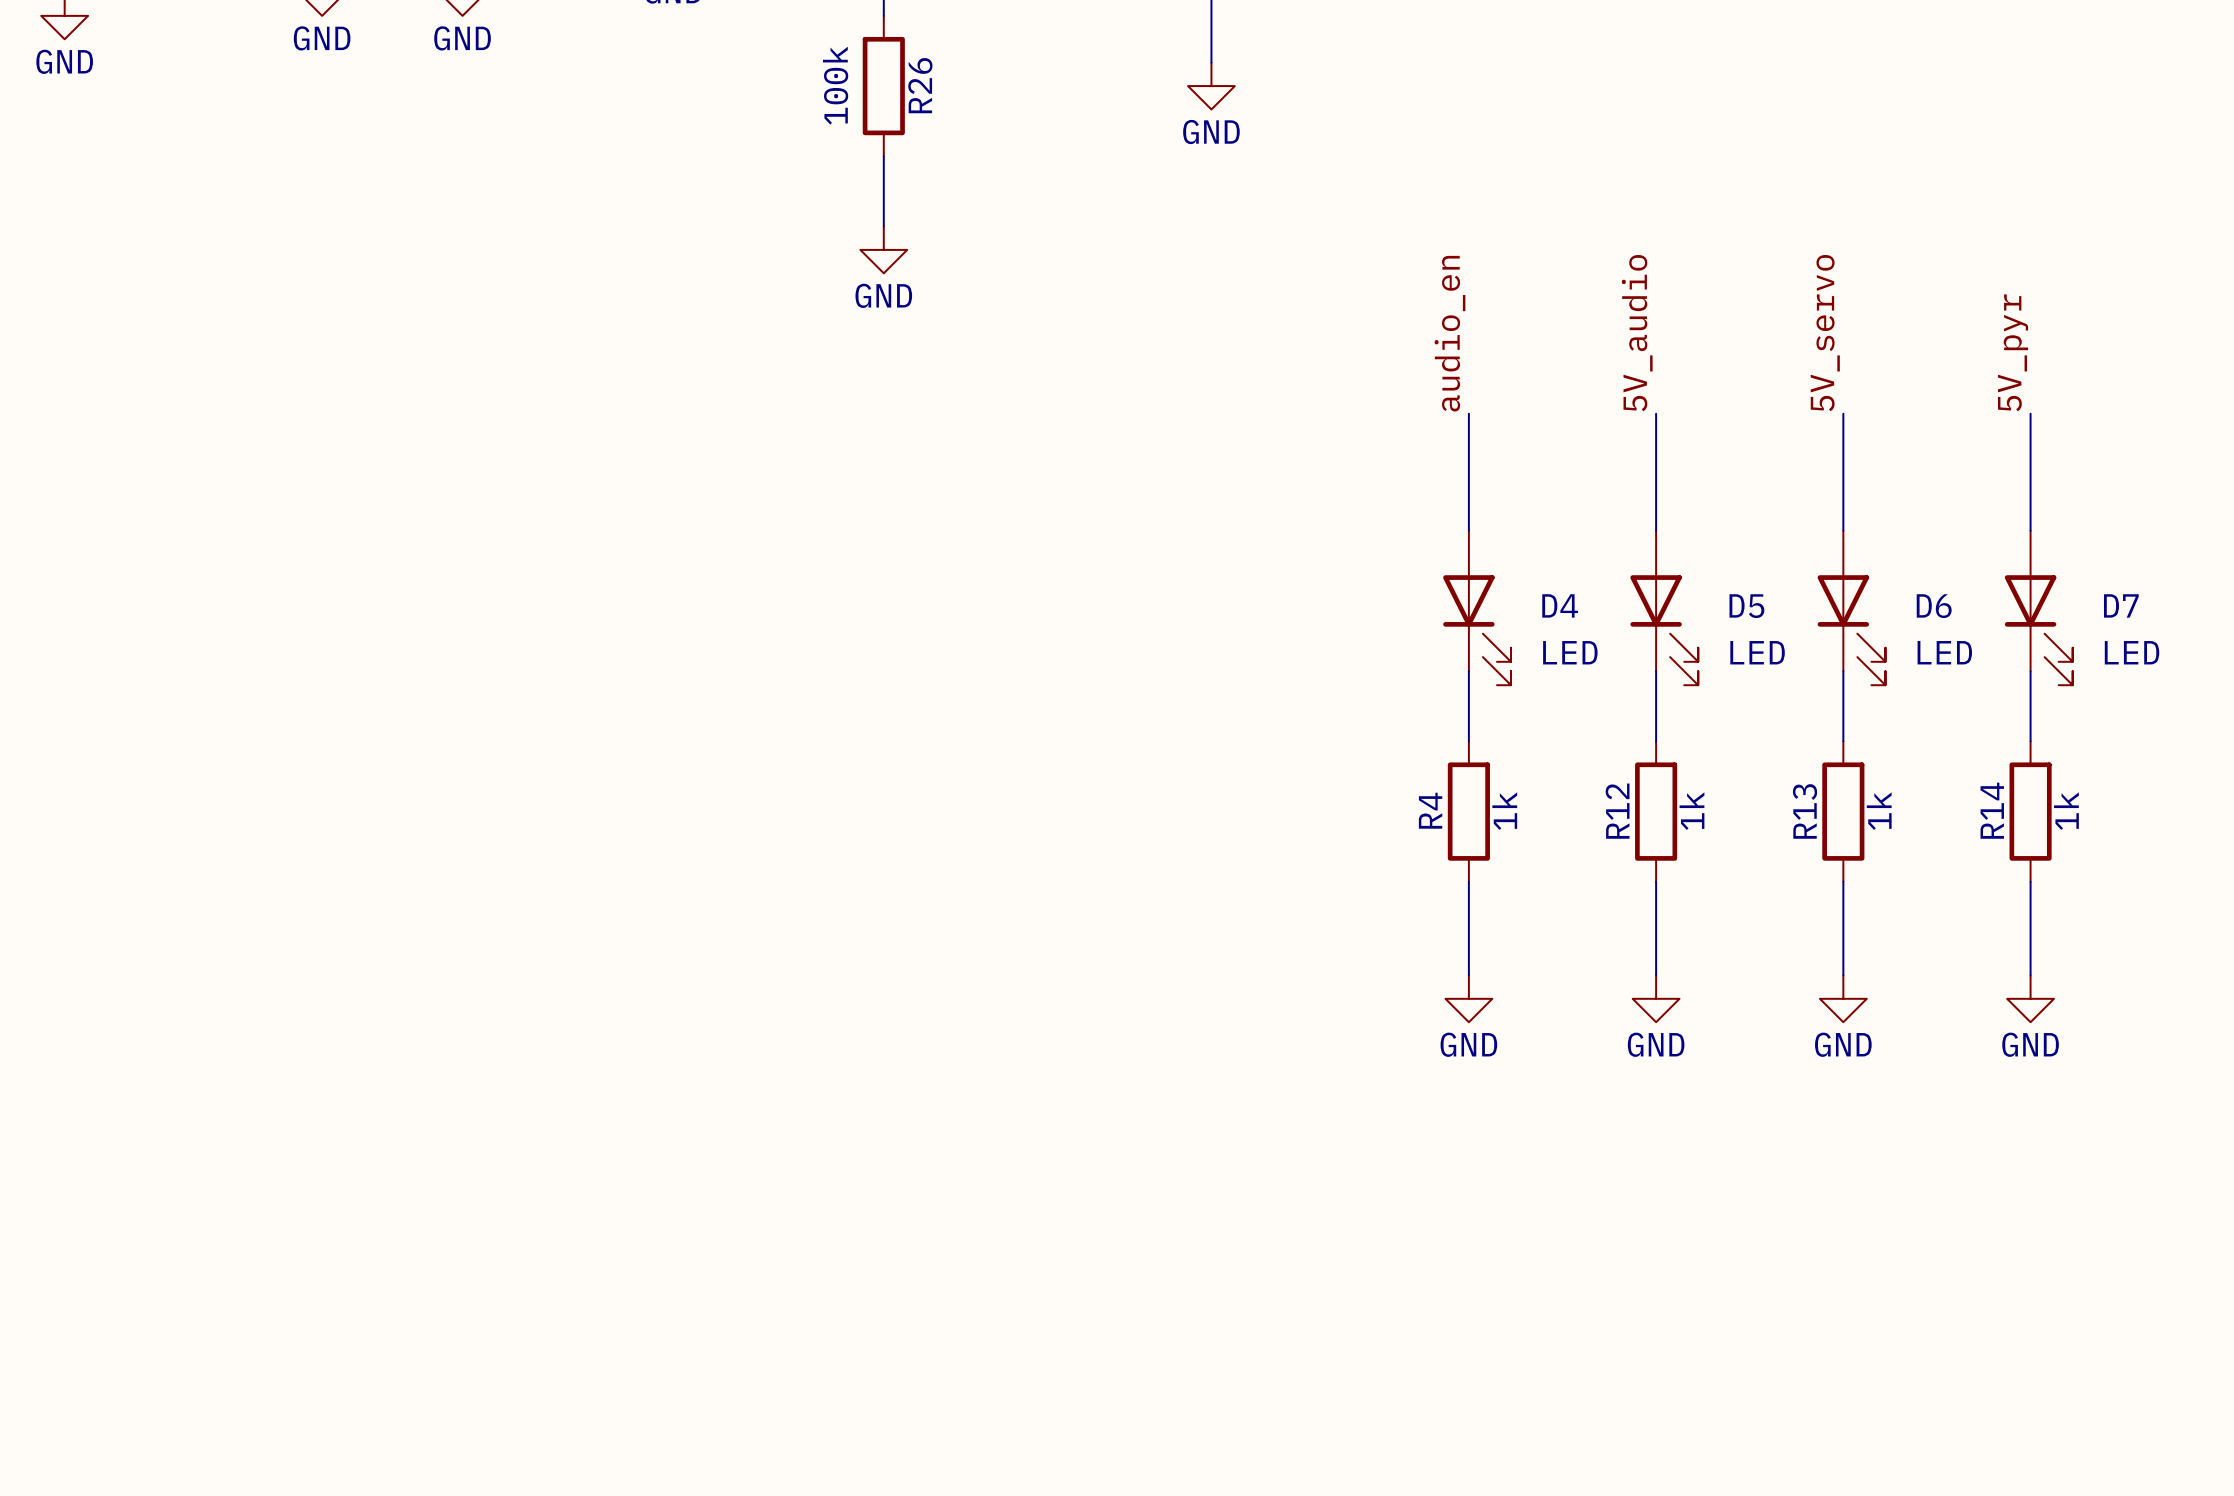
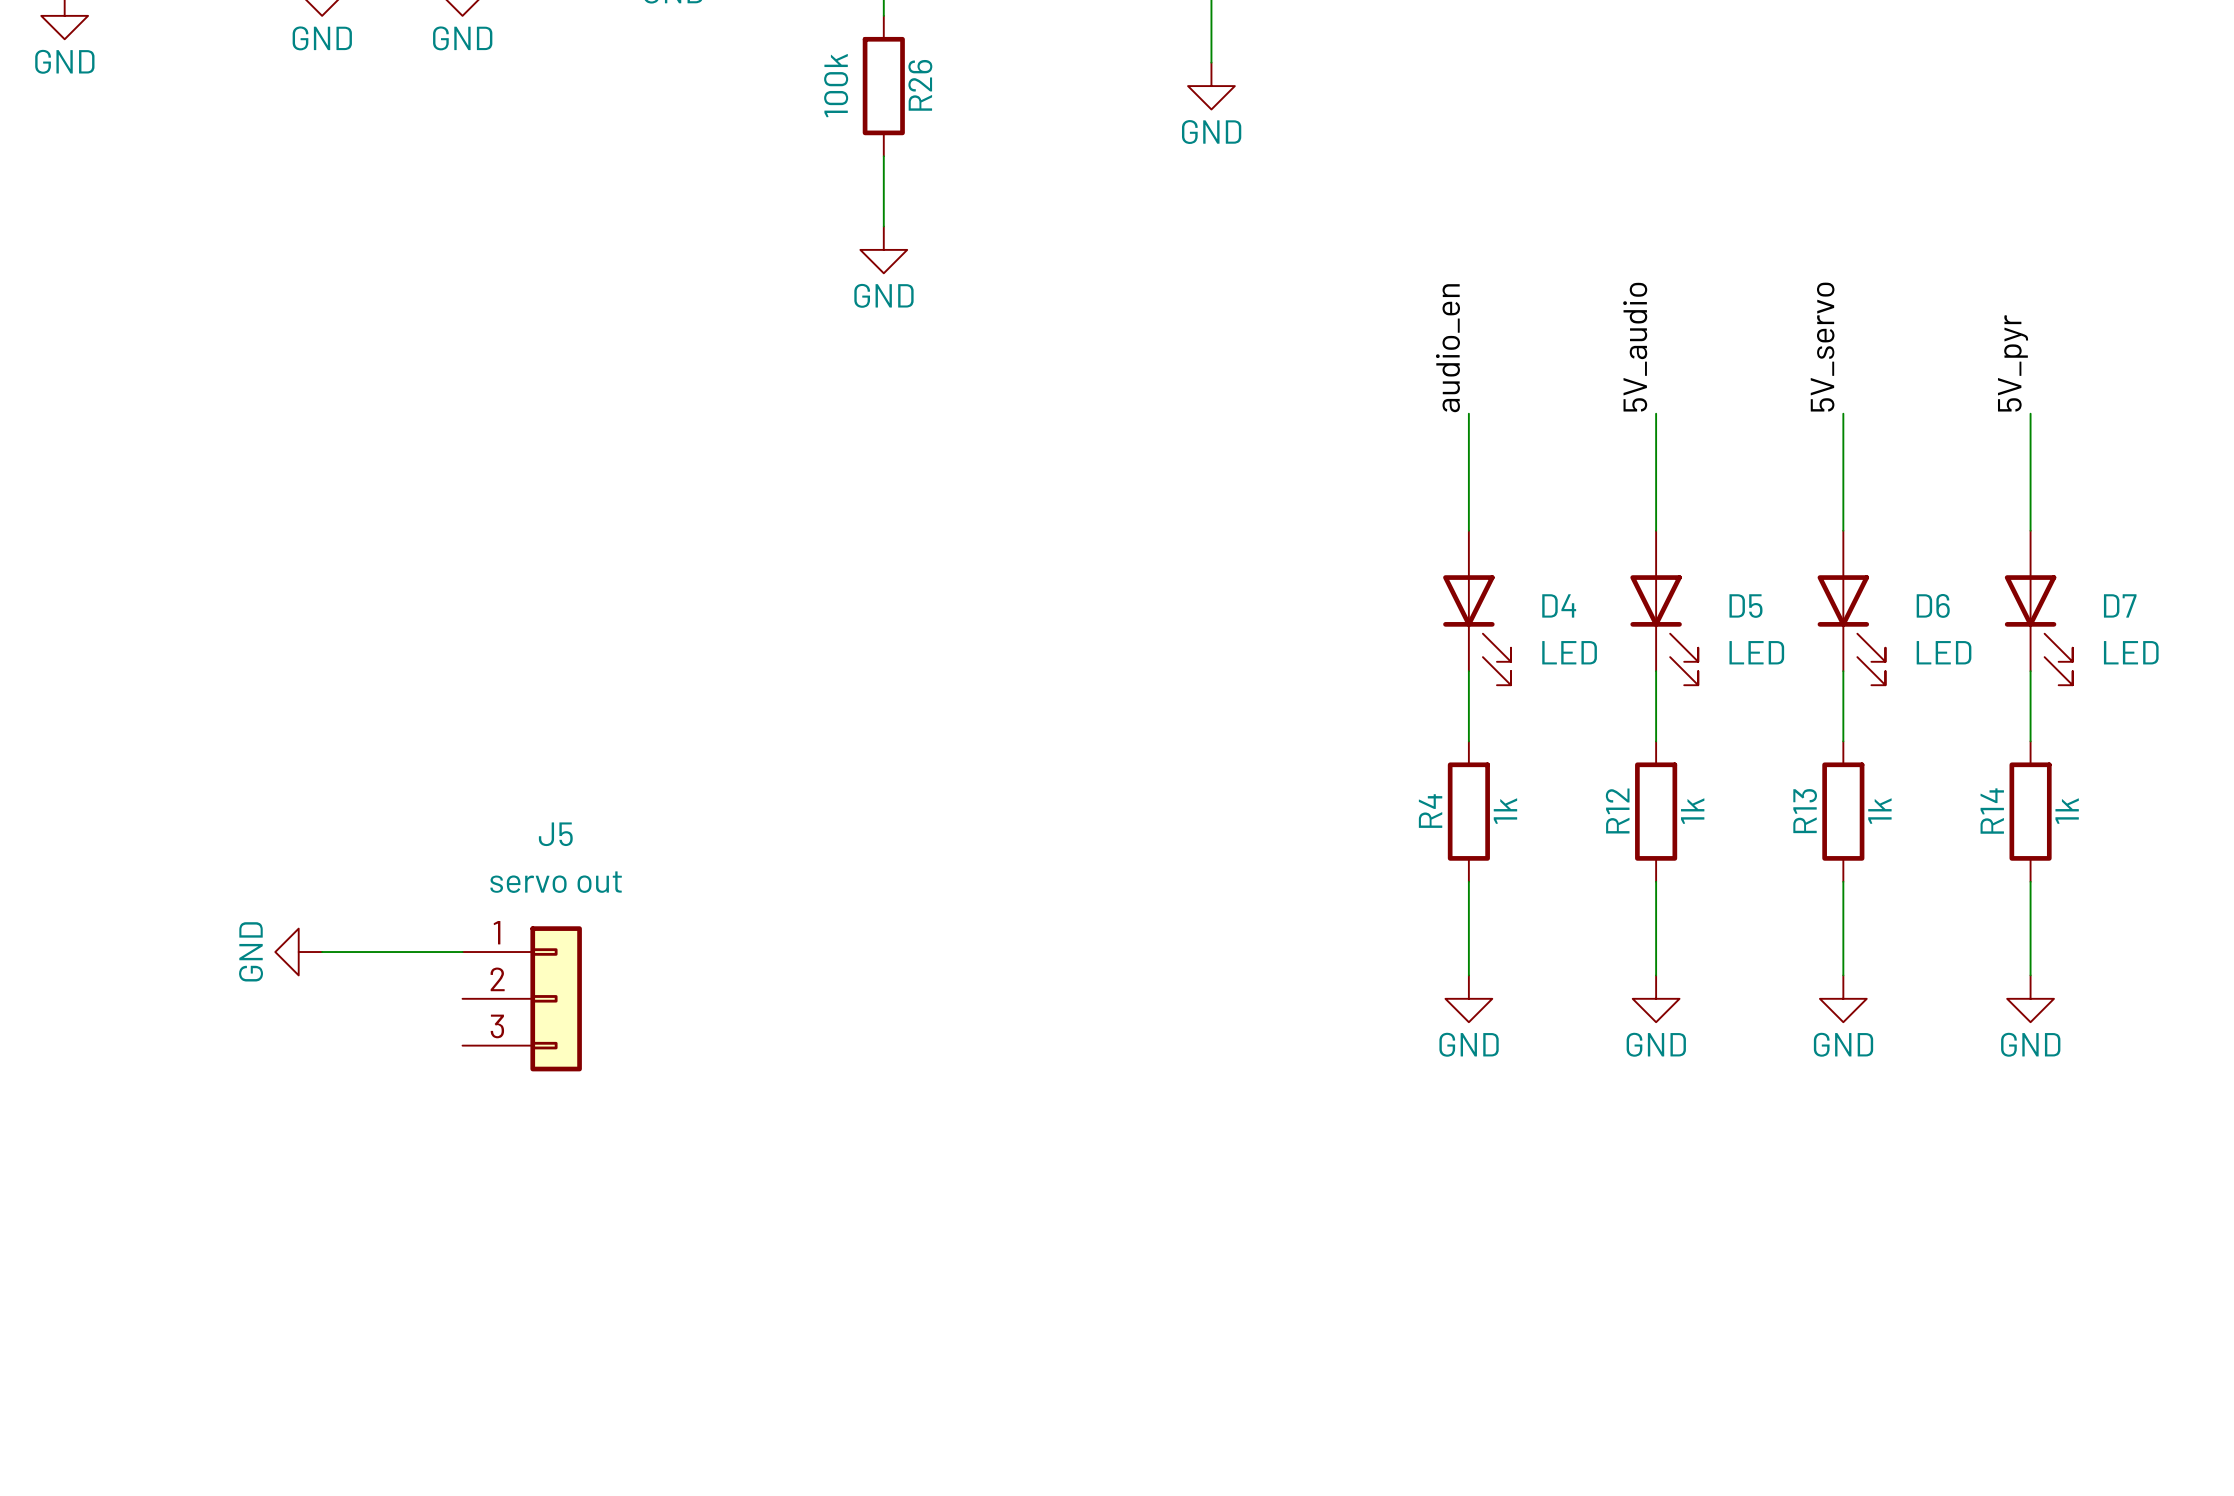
power symbol: none -> GND (298, 952)
wire: none -> (322, 952) (462, 952)
J5: none -> servo out (522, 998)

